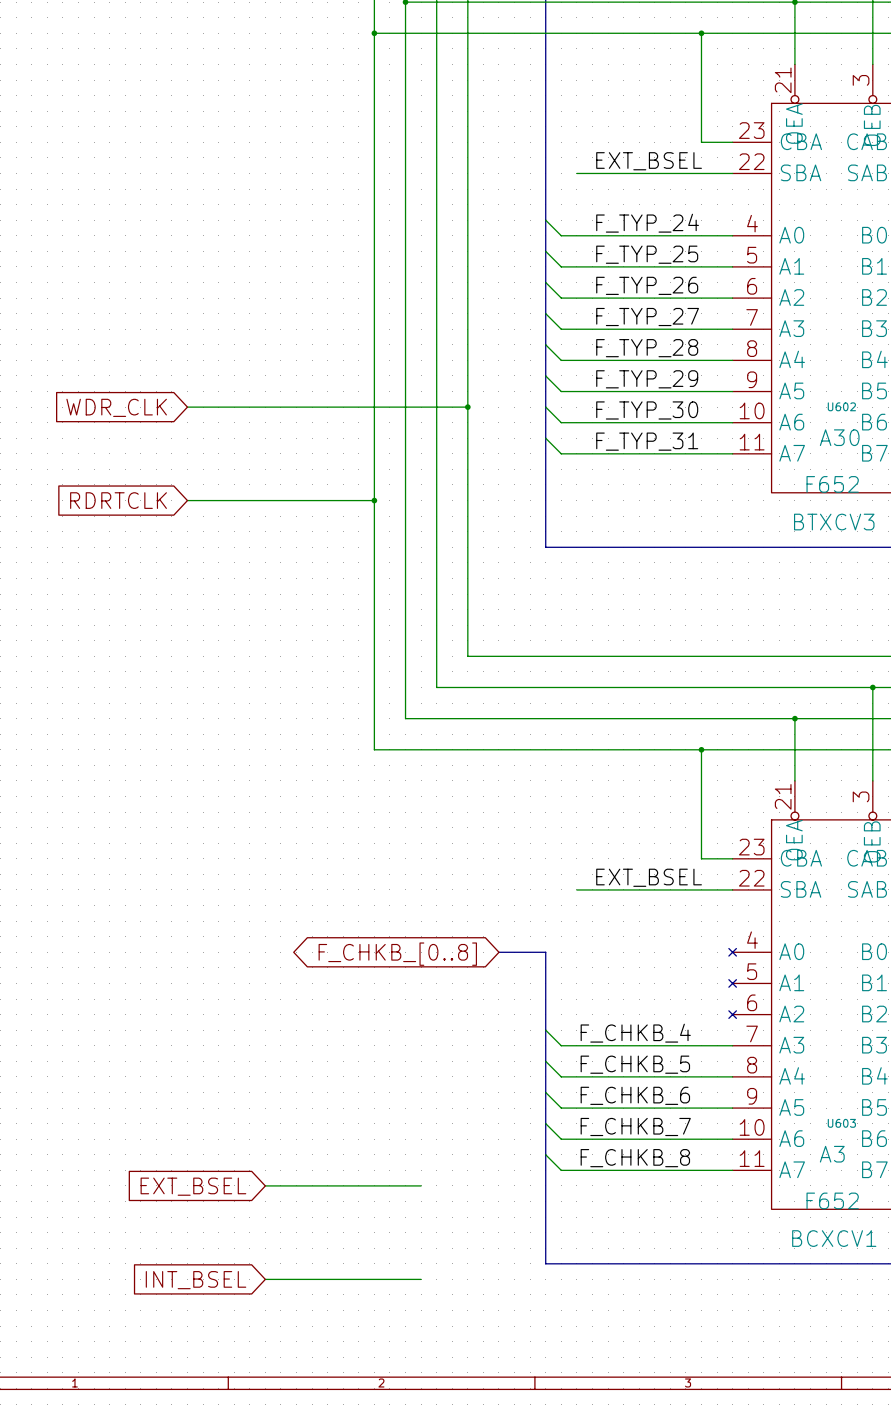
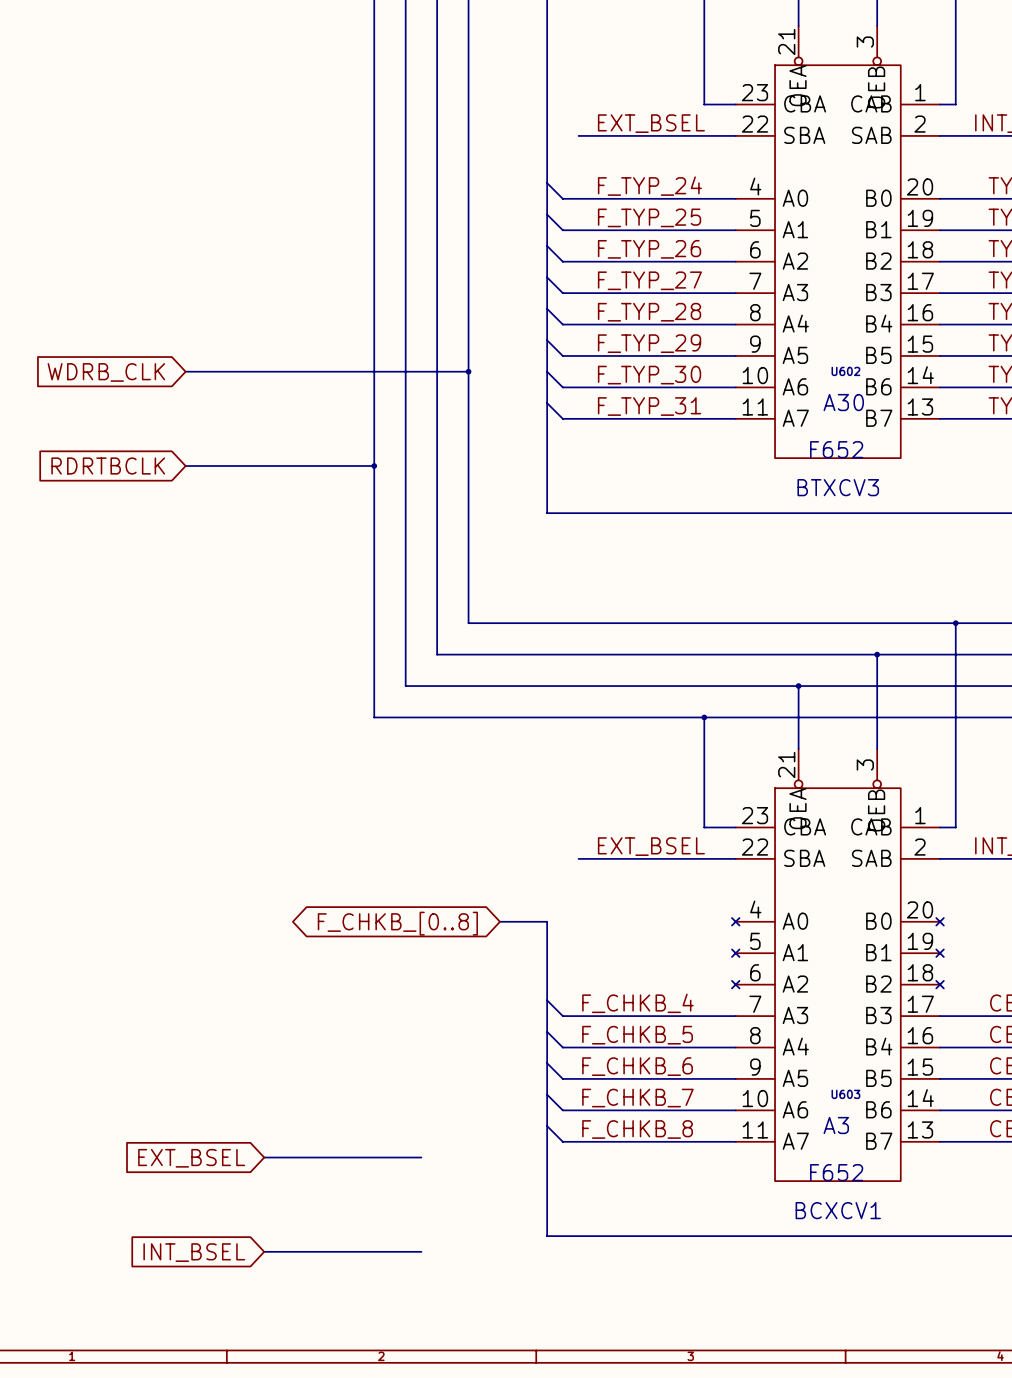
global label: WDR_CLK (116, 407) -> WDRB_CLK (106, 372)
global label: RDRTCLK (118, 500) -> RDRTBCLK (108, 466)

